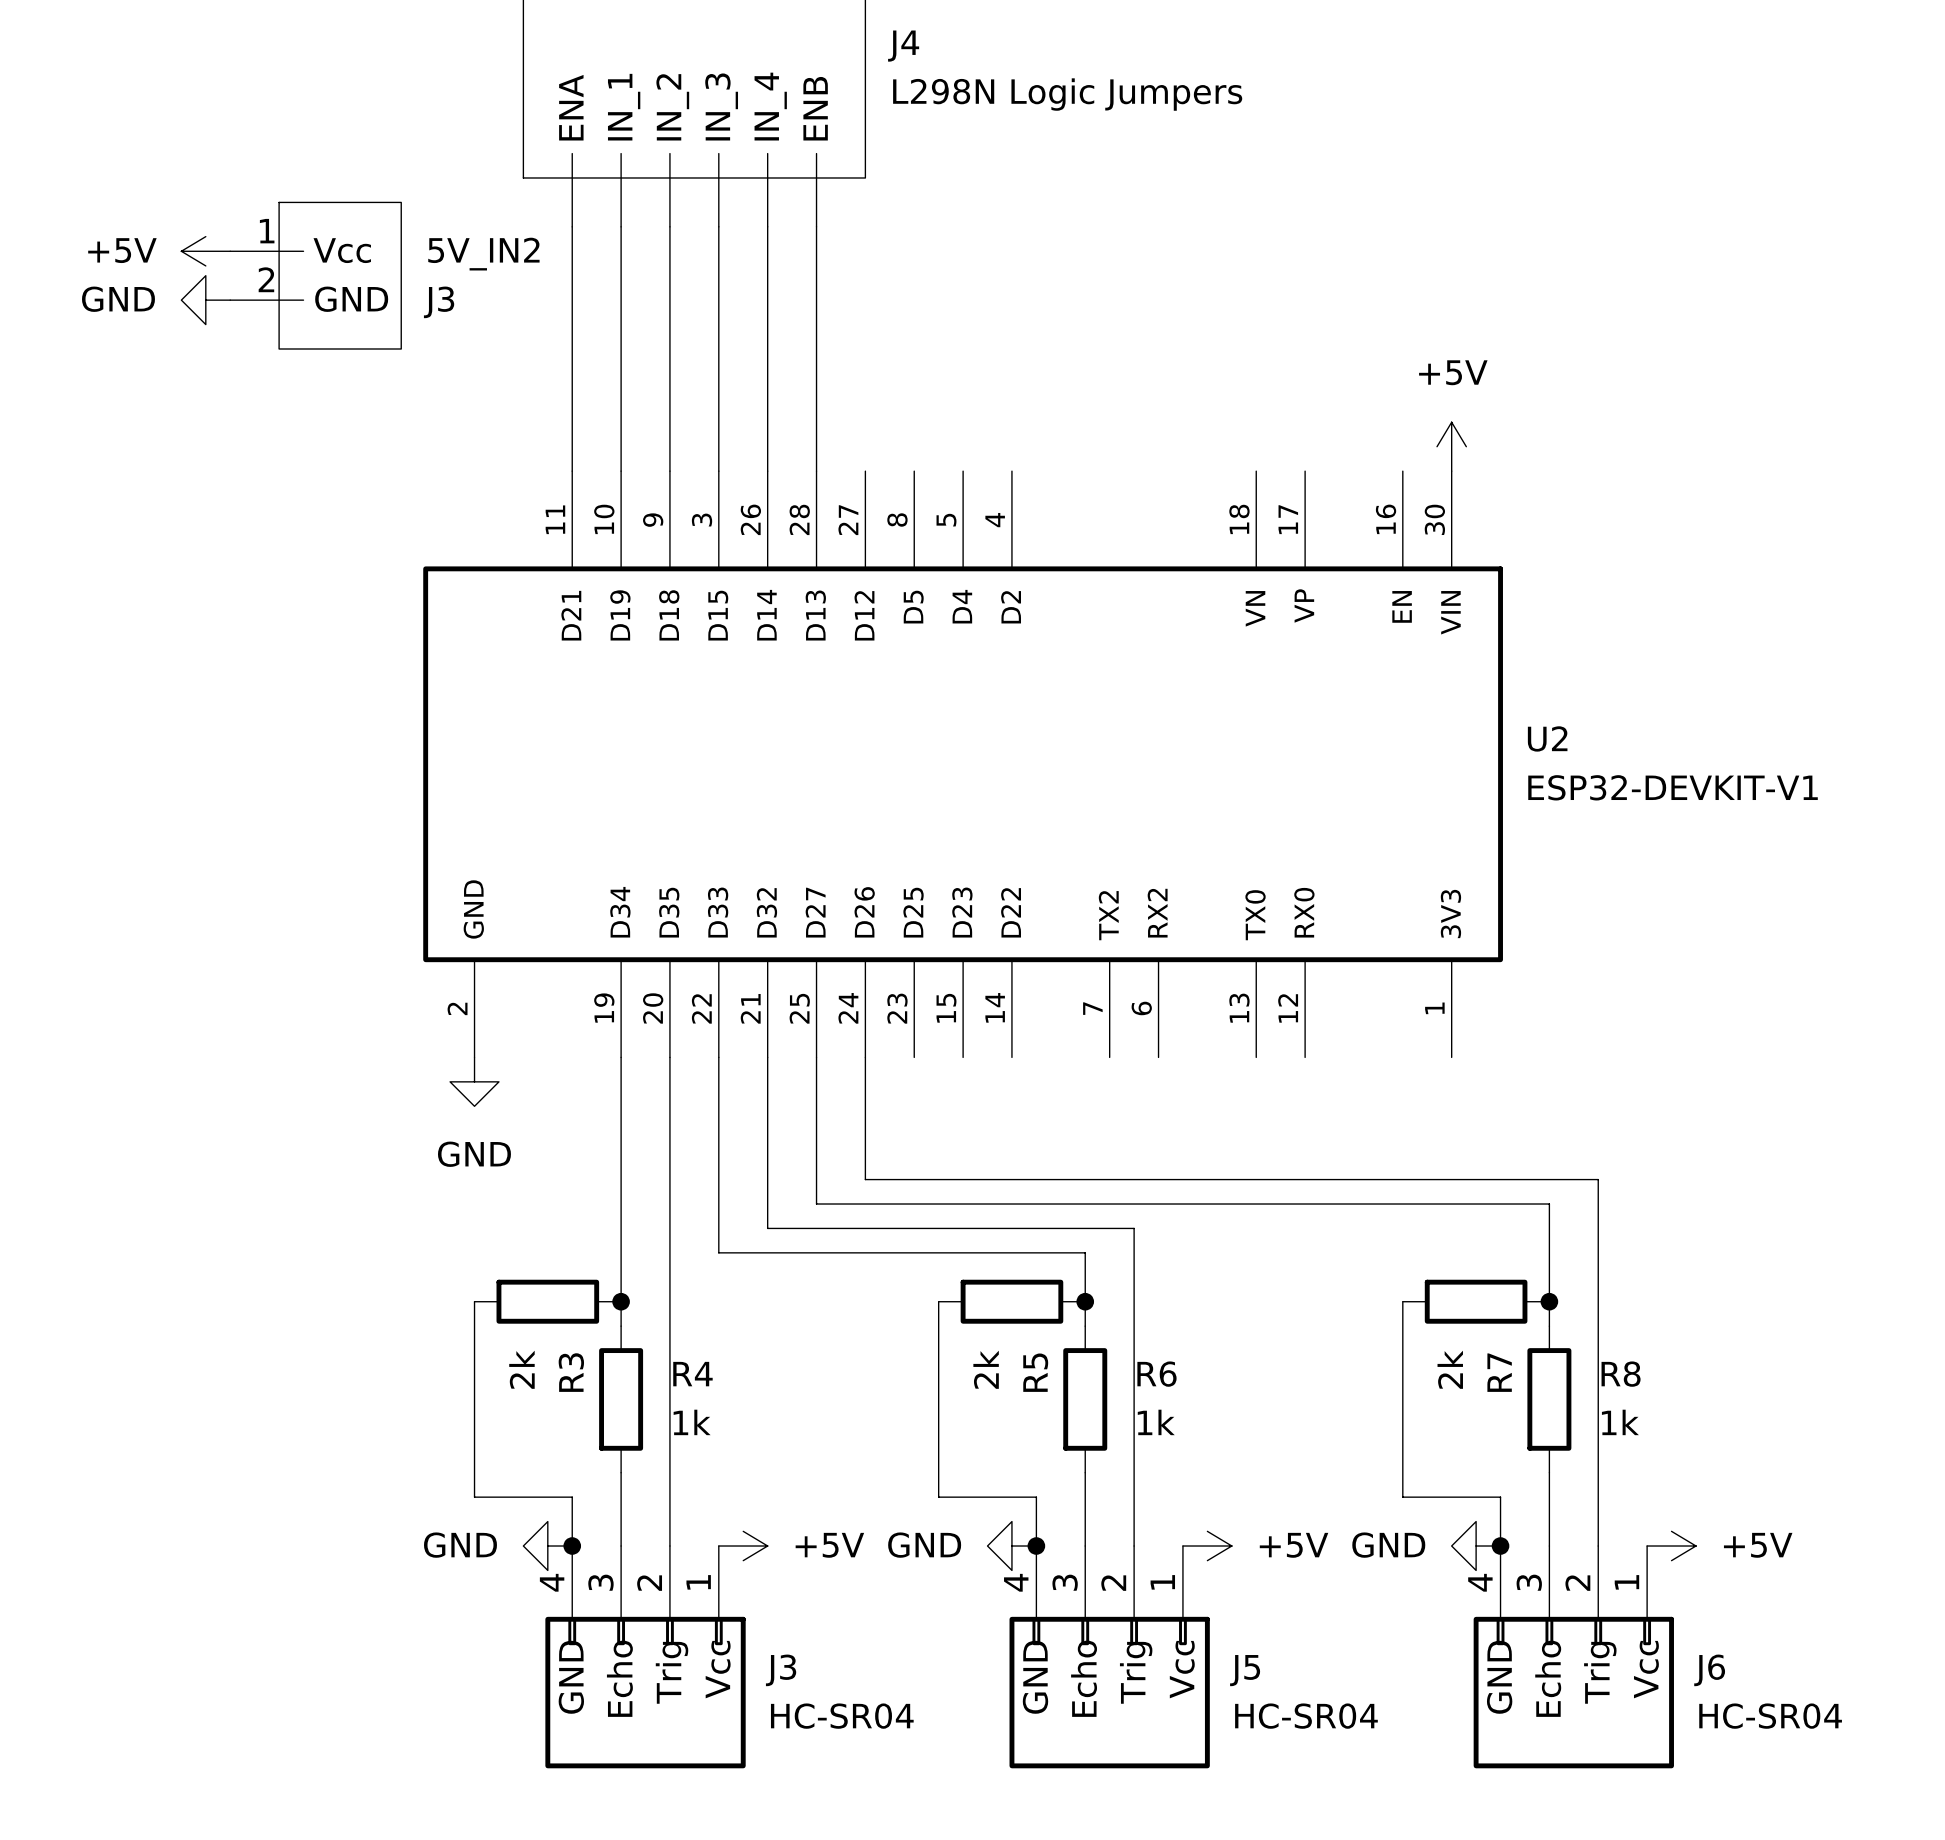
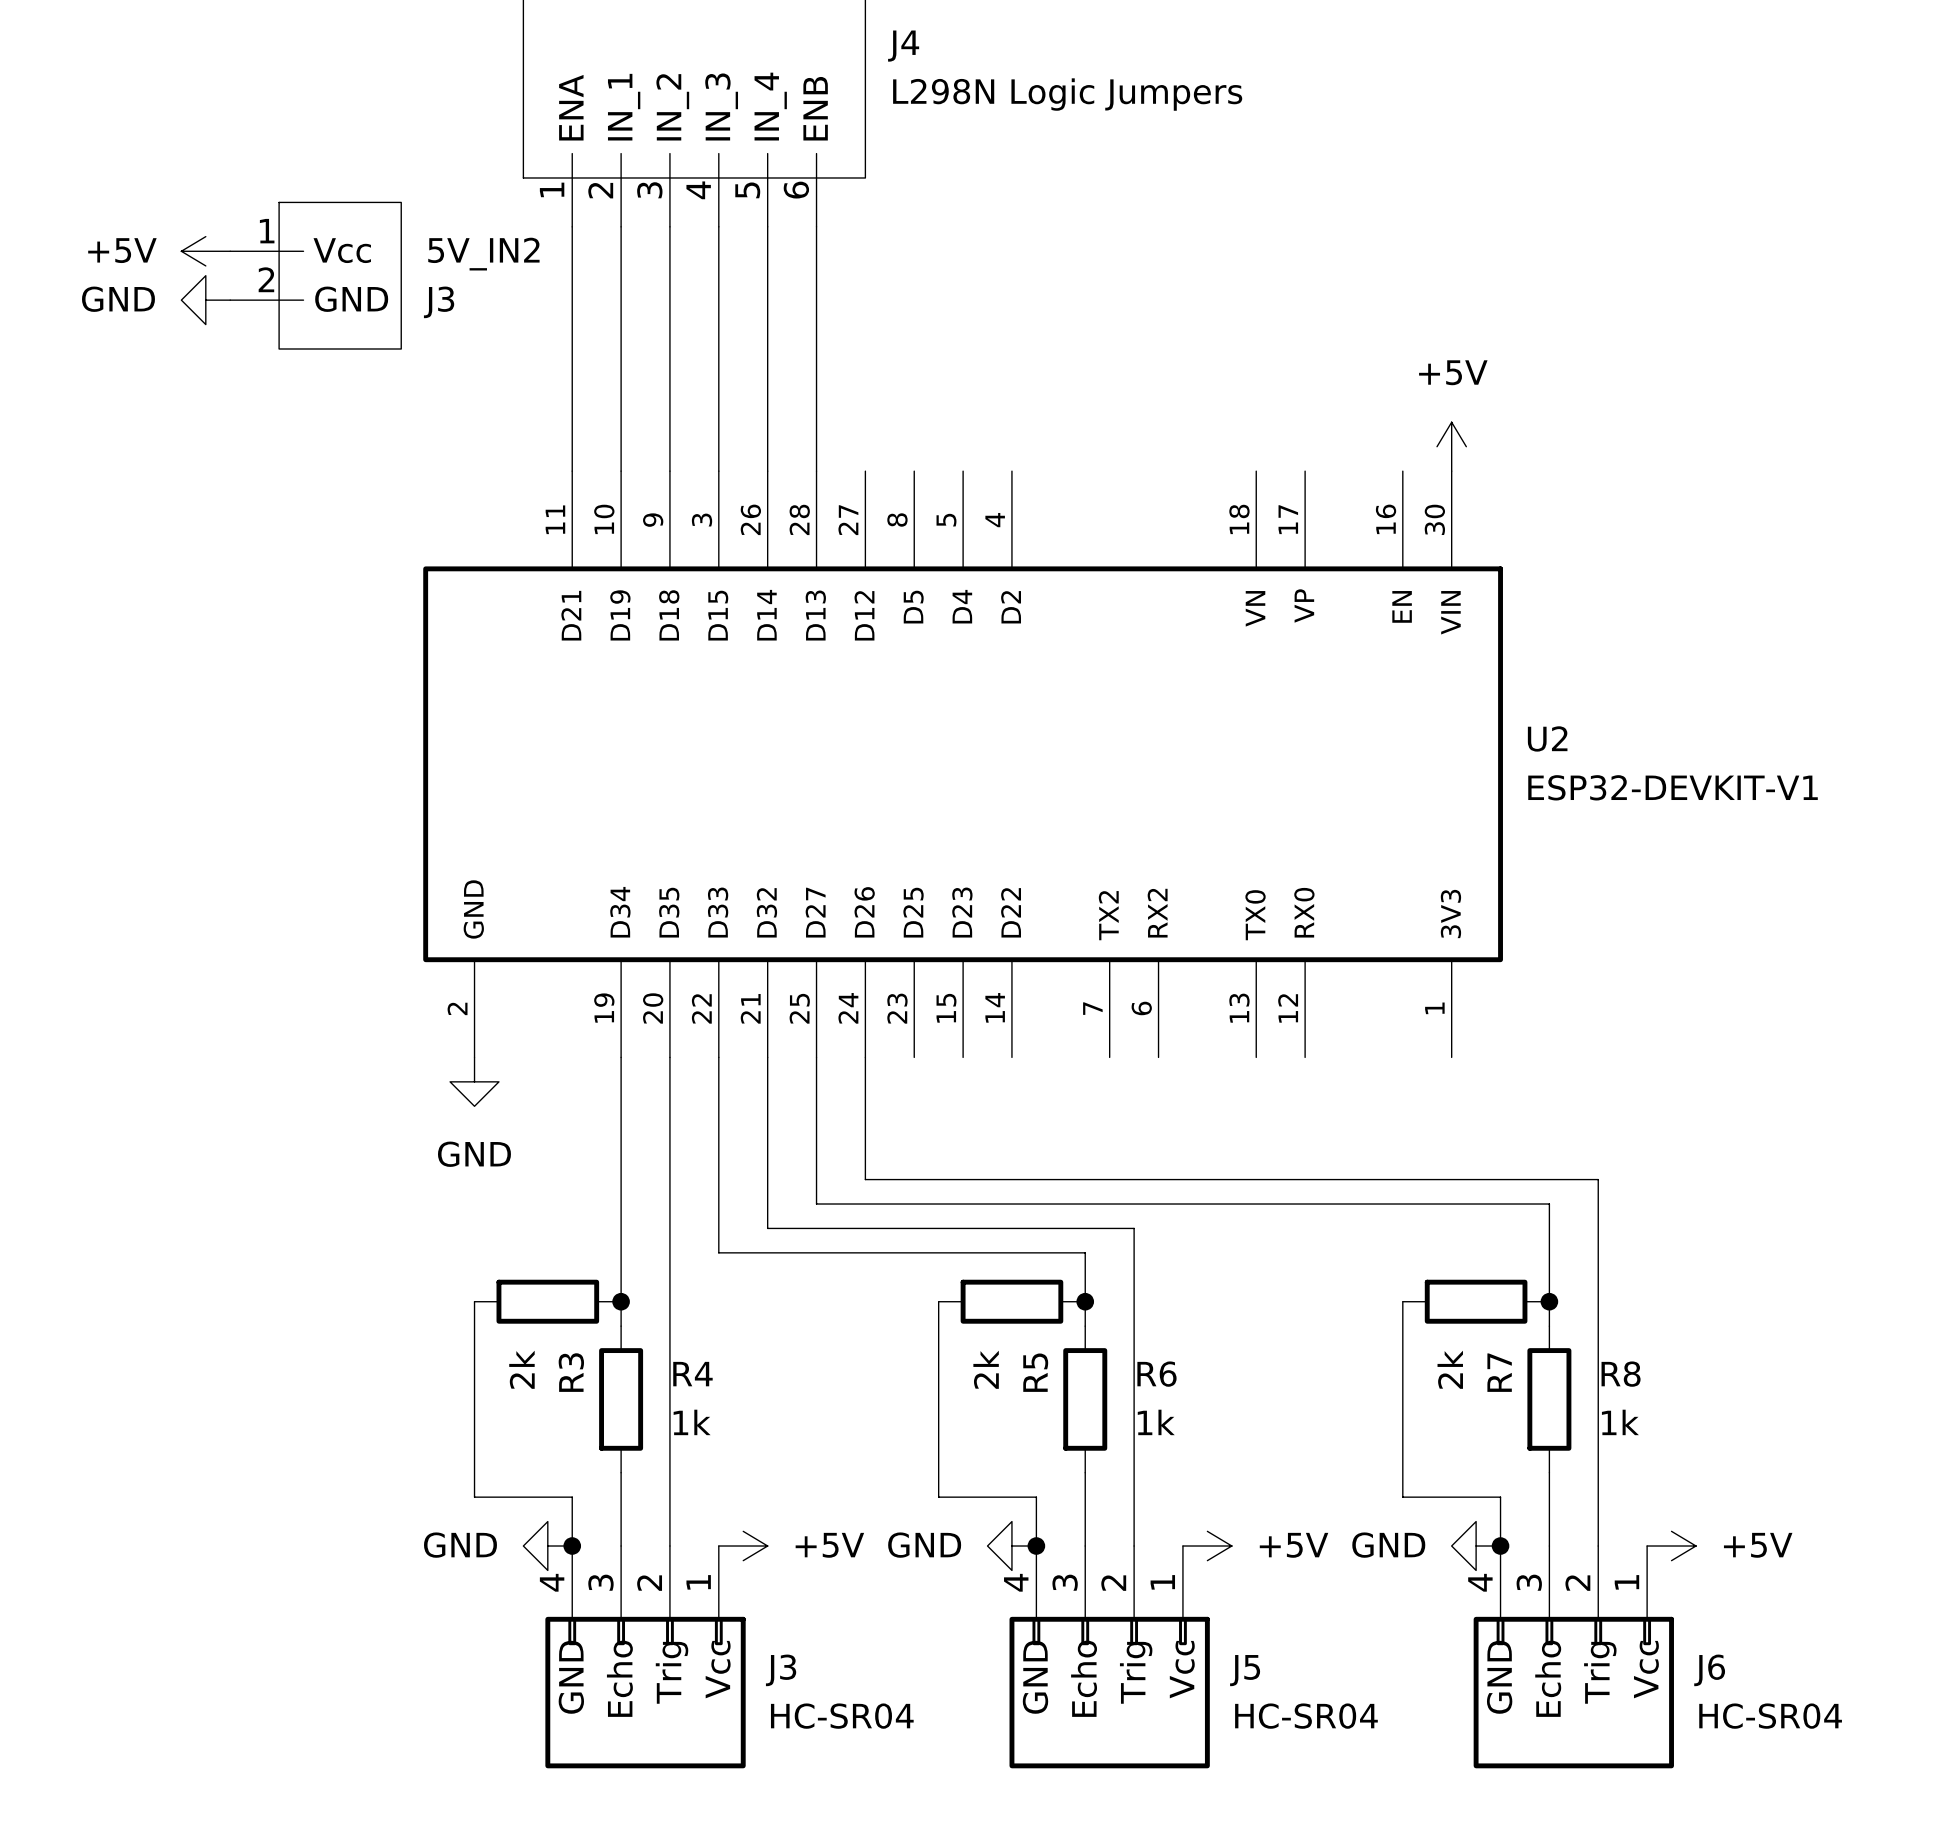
J4 pin number: none -> 1 (552, 189)
J4 pin number: none -> 2 (600, 190)
J4 pin number: none -> 3 (649, 190)
J4 pin number: none -> 4 (698, 190)
J4 pin number: none -> 5 (747, 190)
J4 pin number: none -> 6 (796, 190)

